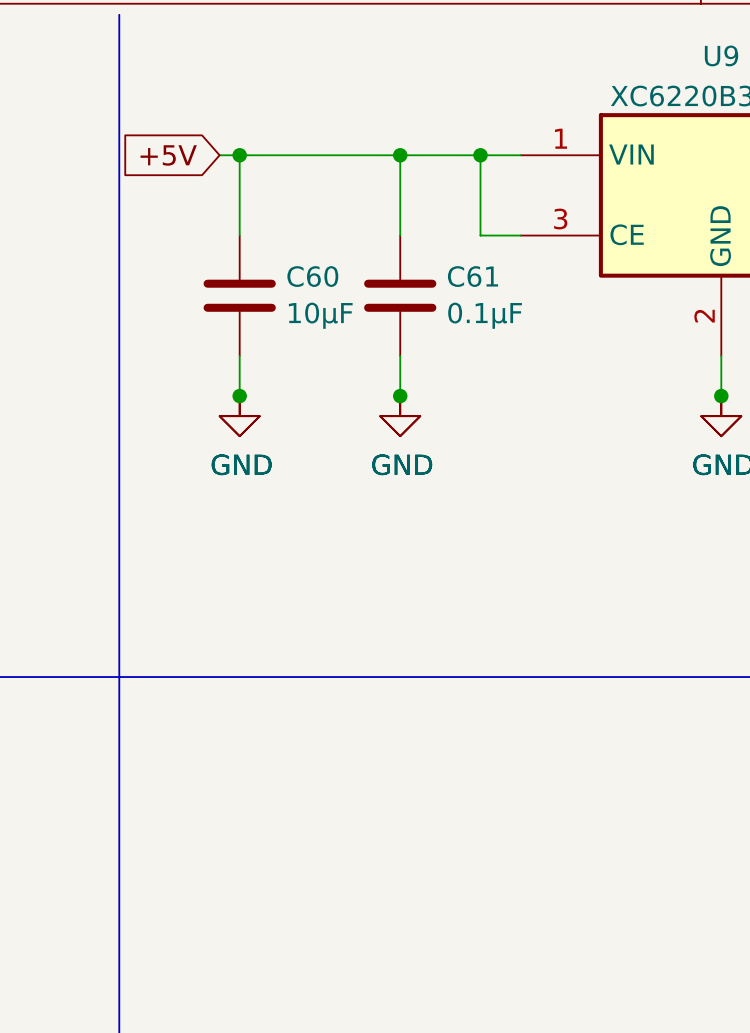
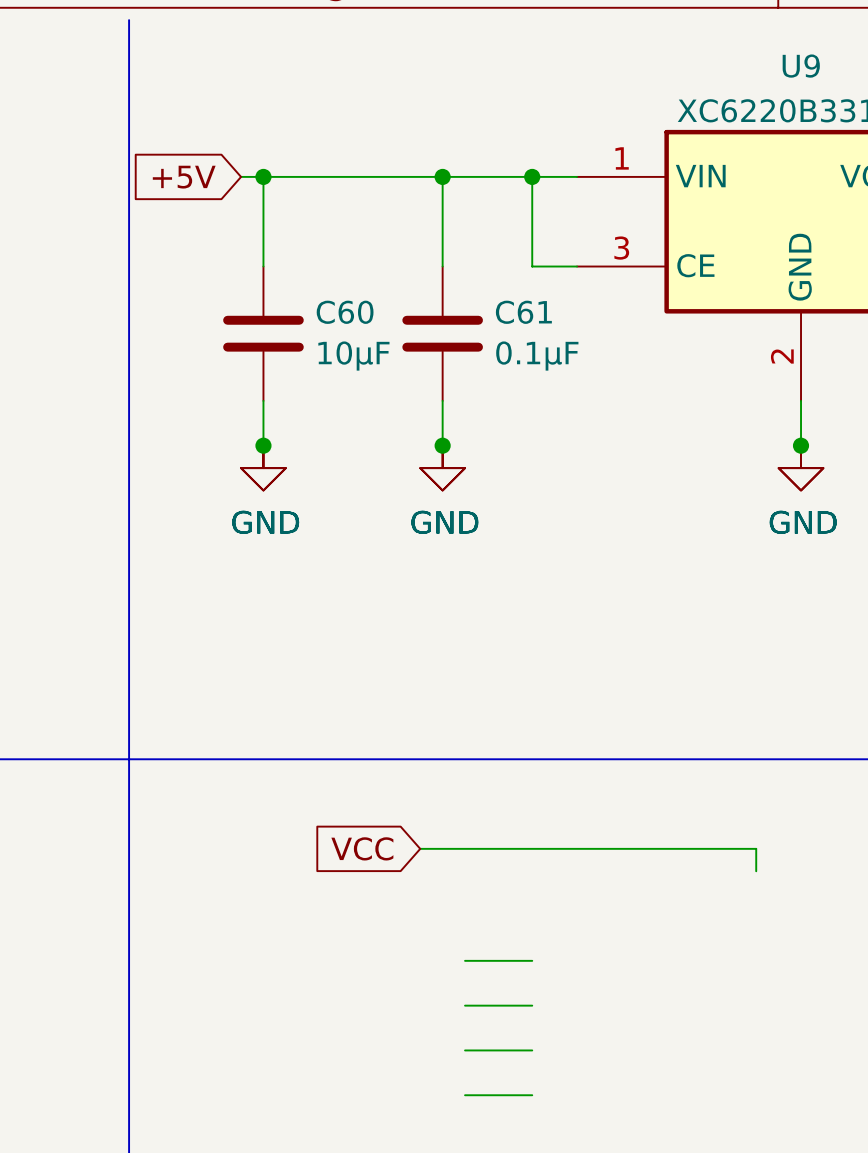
global label: none -> VCC (362, 848)
wire: none -> (420, 848) (756, 848) (756, 871)
wire: none -> (465, 960) (532, 960)
wire: none -> (465, 1005) (532, 1005)
wire: none -> (465, 1050) (532, 1050)
wire: none -> (465, 1095) (532, 1095)

